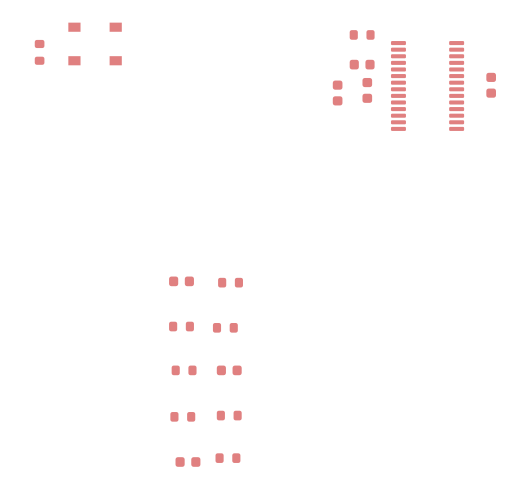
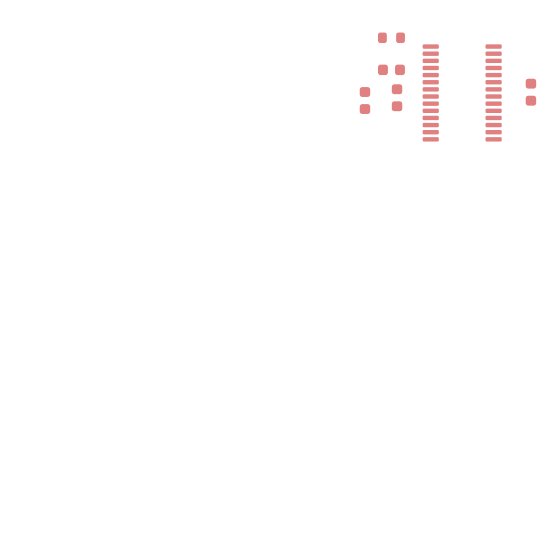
part: (74, 43) -> none
part: (115, 43) -> none
part: (39, 52) -> none
part: (181, 281) -> none
part: (230, 282) -> none
part: (181, 326) -> none
part: (225, 327) -> none
part: (184, 370) -> none
part: (229, 370) -> none
part: (229, 415) -> none
part: (182, 416) -> none
part: (227, 458) -> none
part: (187, 461) -> none

